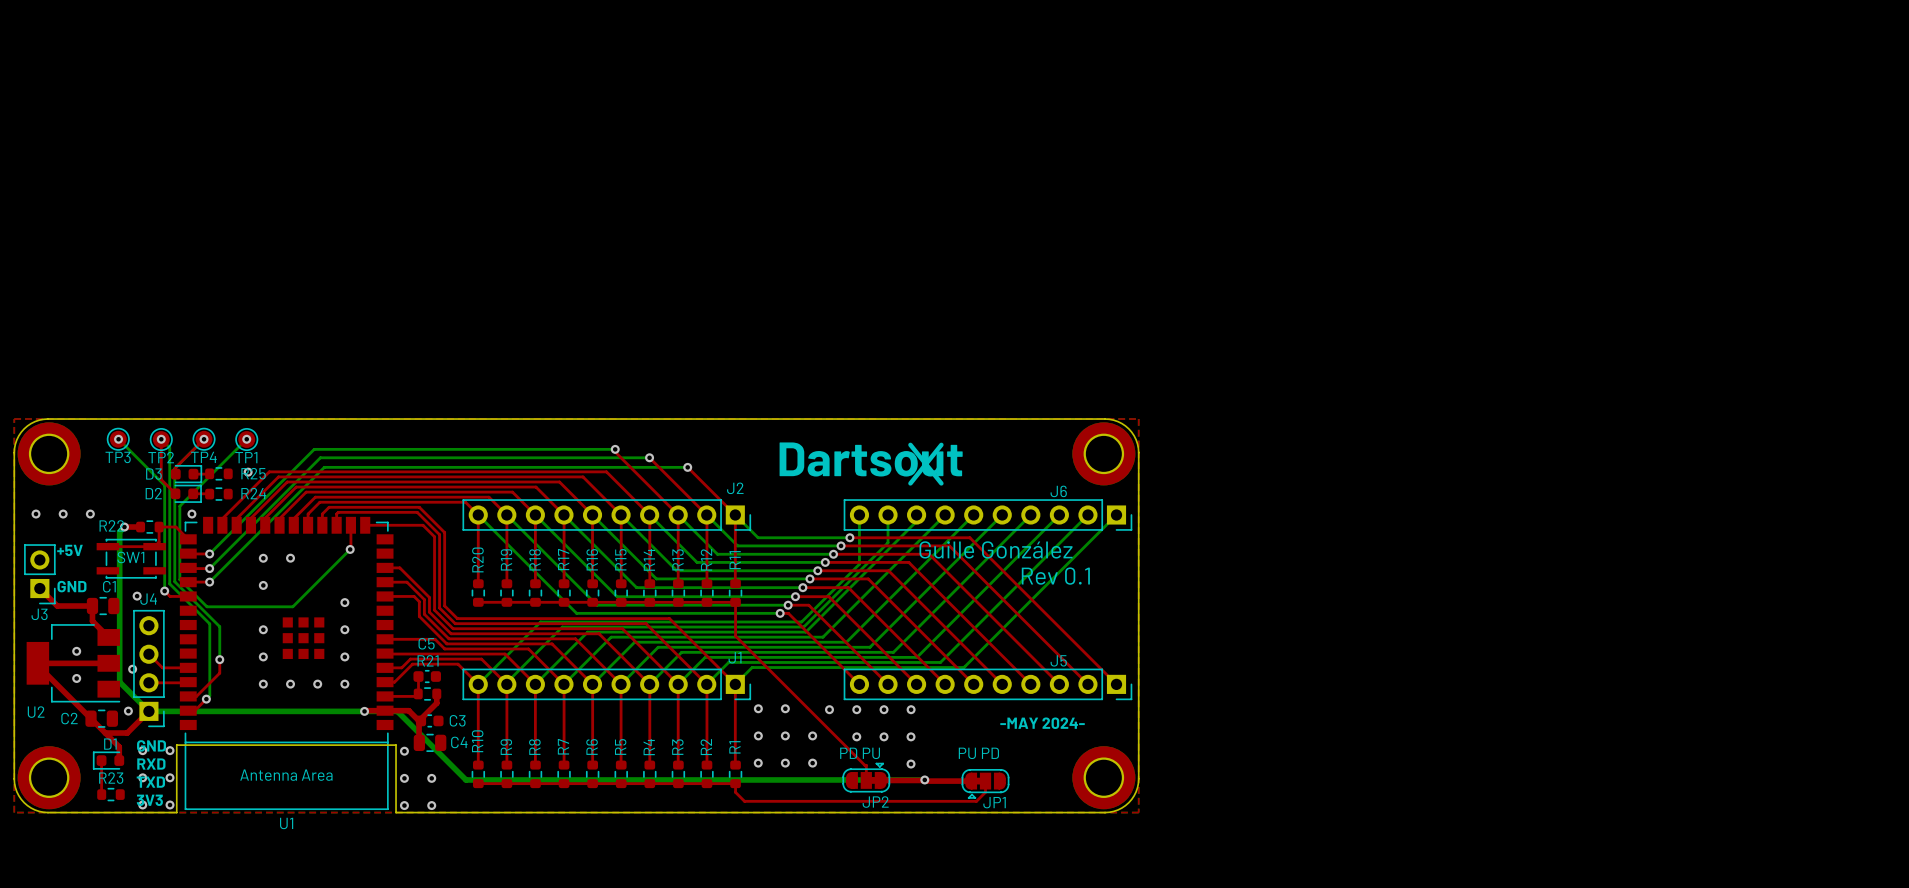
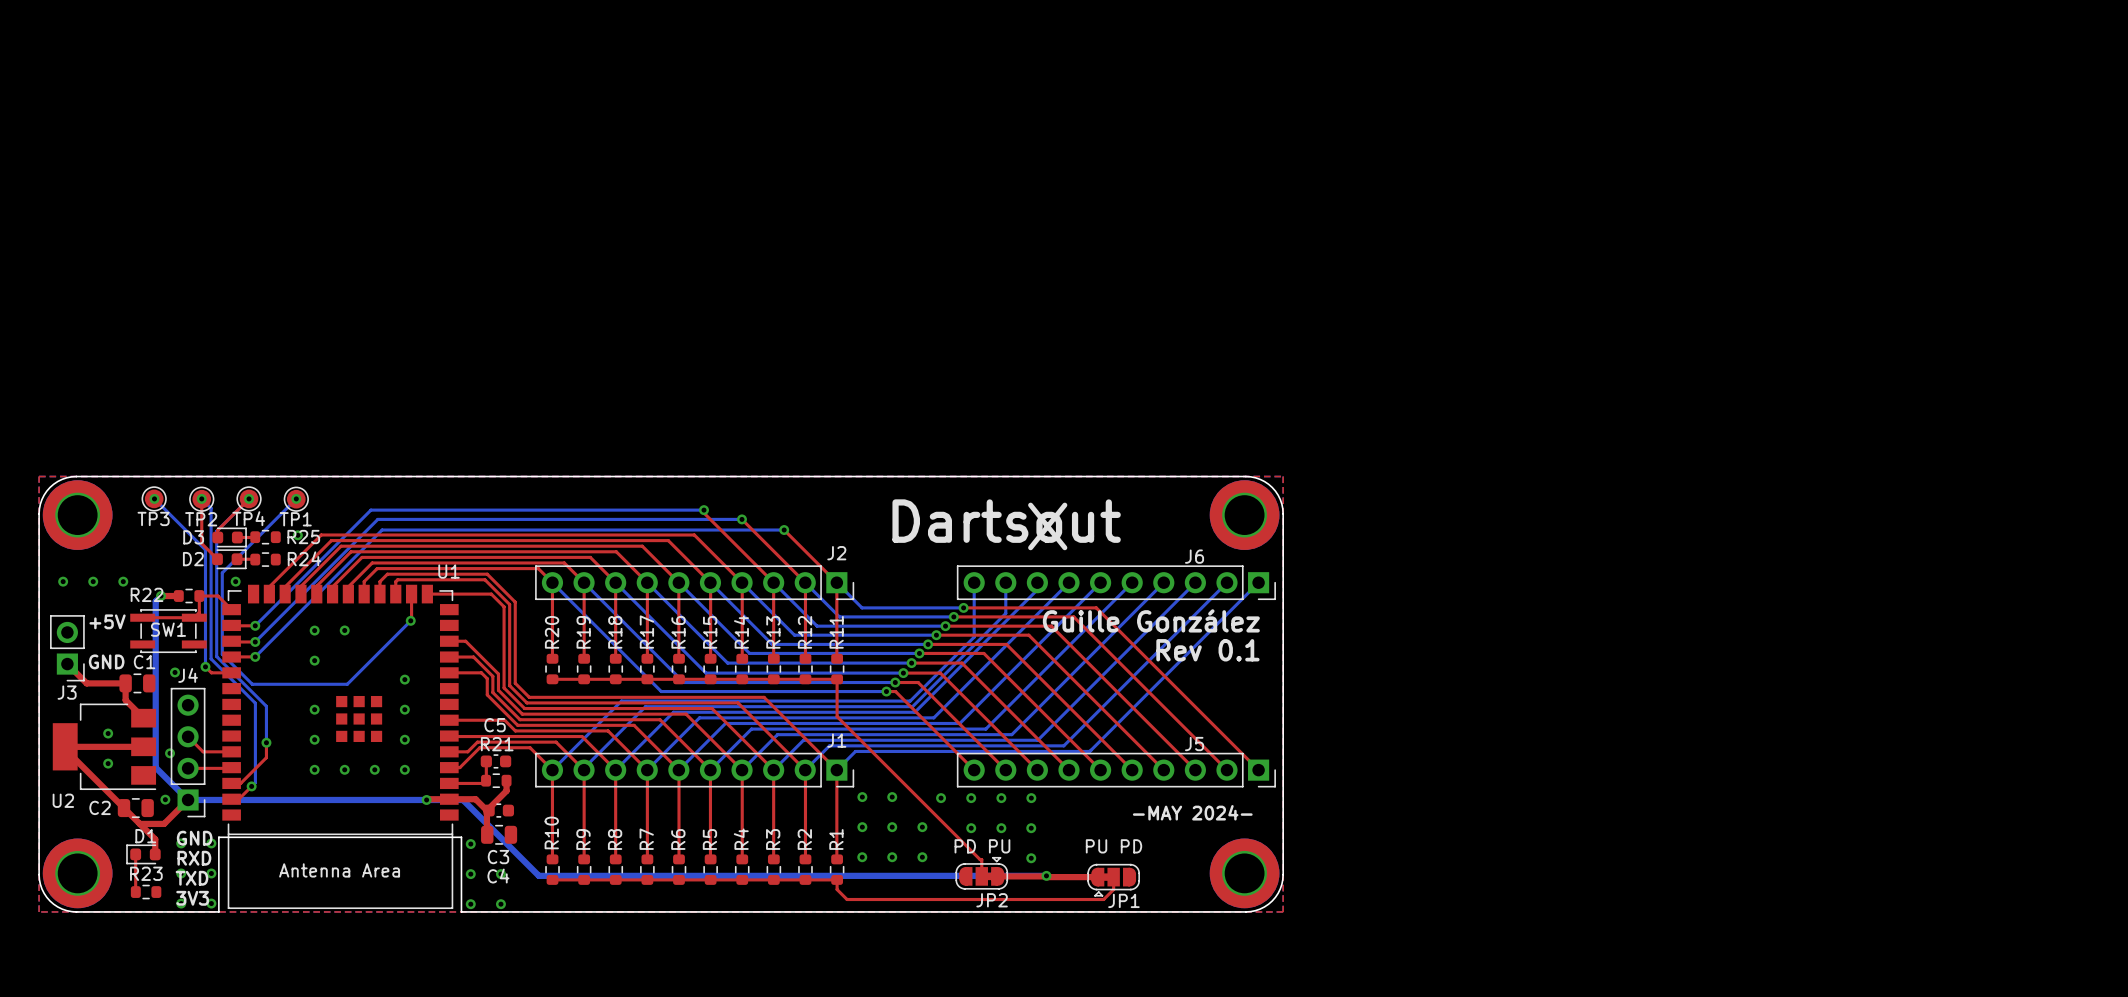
C3 name position: C3 (457, 720) -> C3 (498, 857)
C4 name position: C4 (459, 742) -> C4 (498, 876)
U1 name position: U1 (286, 823) -> U1 (449, 571)

